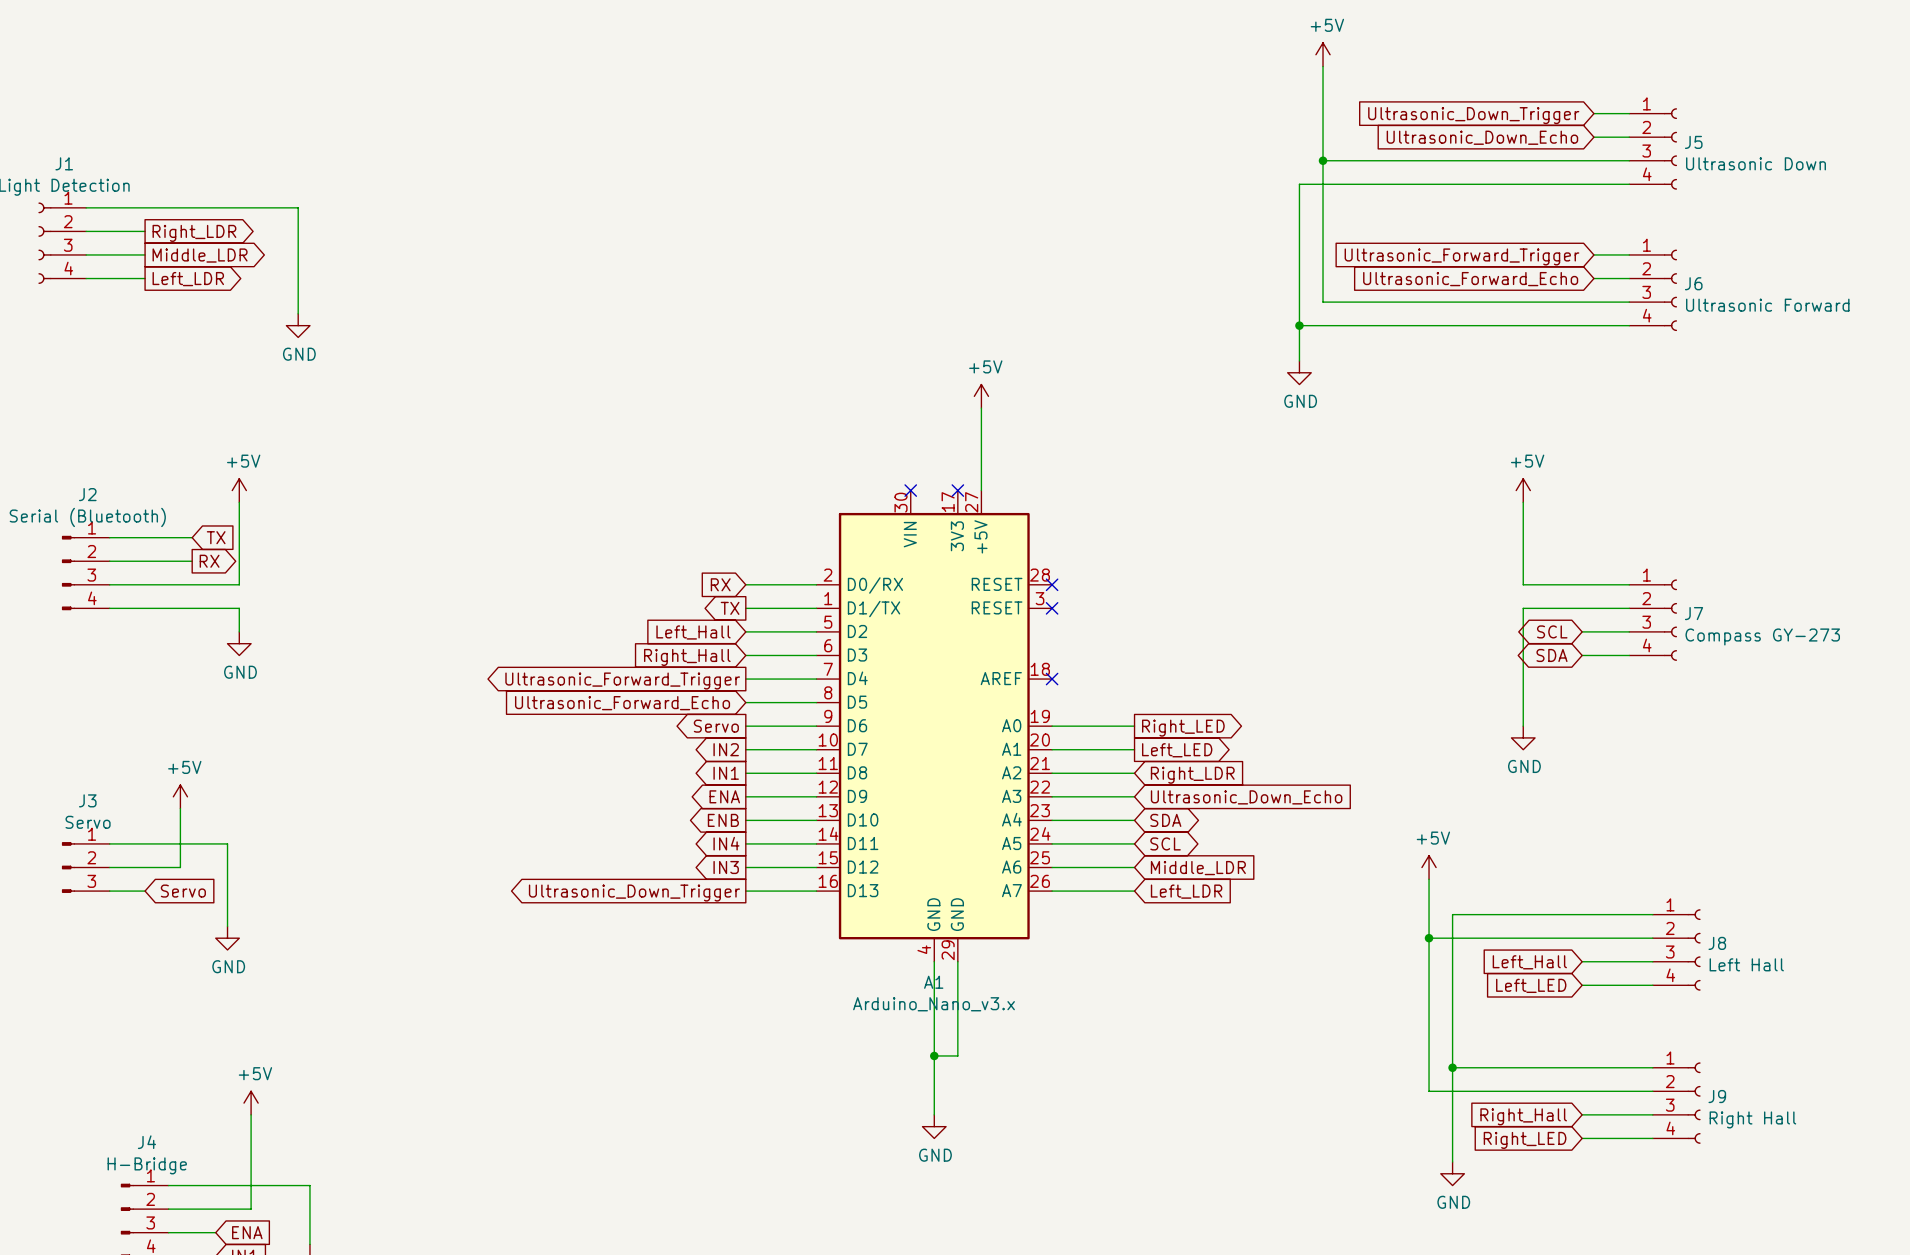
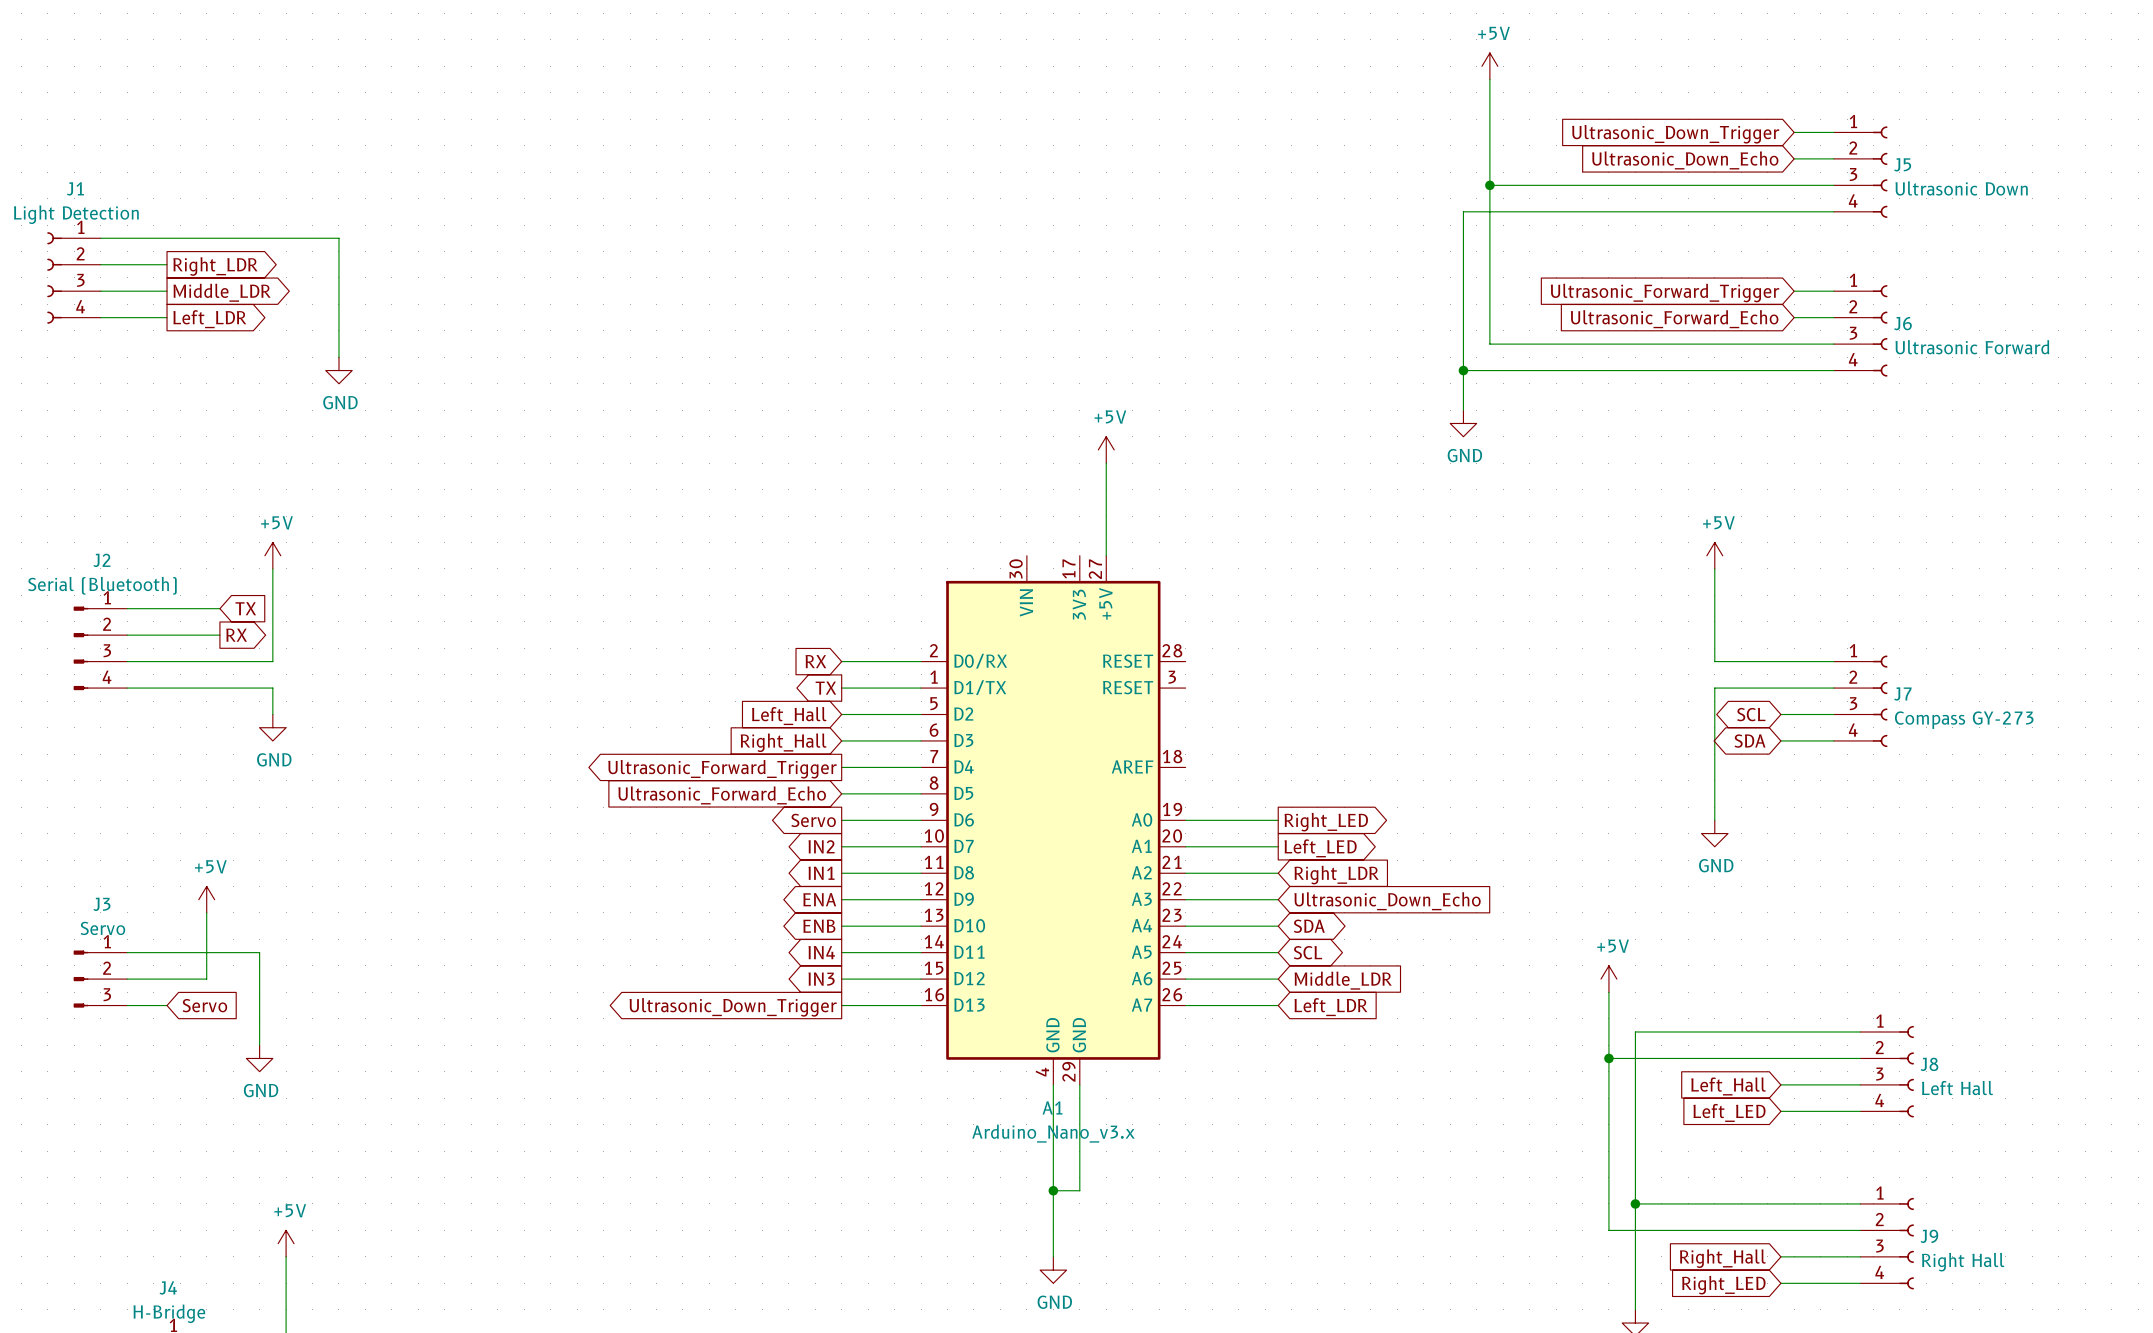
no-connect mark: (910, 490) -> none
no-connect mark: (957, 490) -> none
no-connect mark: (1052, 584) -> none
no-connect mark: (1052, 608) -> none
no-connect mark: (1052, 679) -> none

